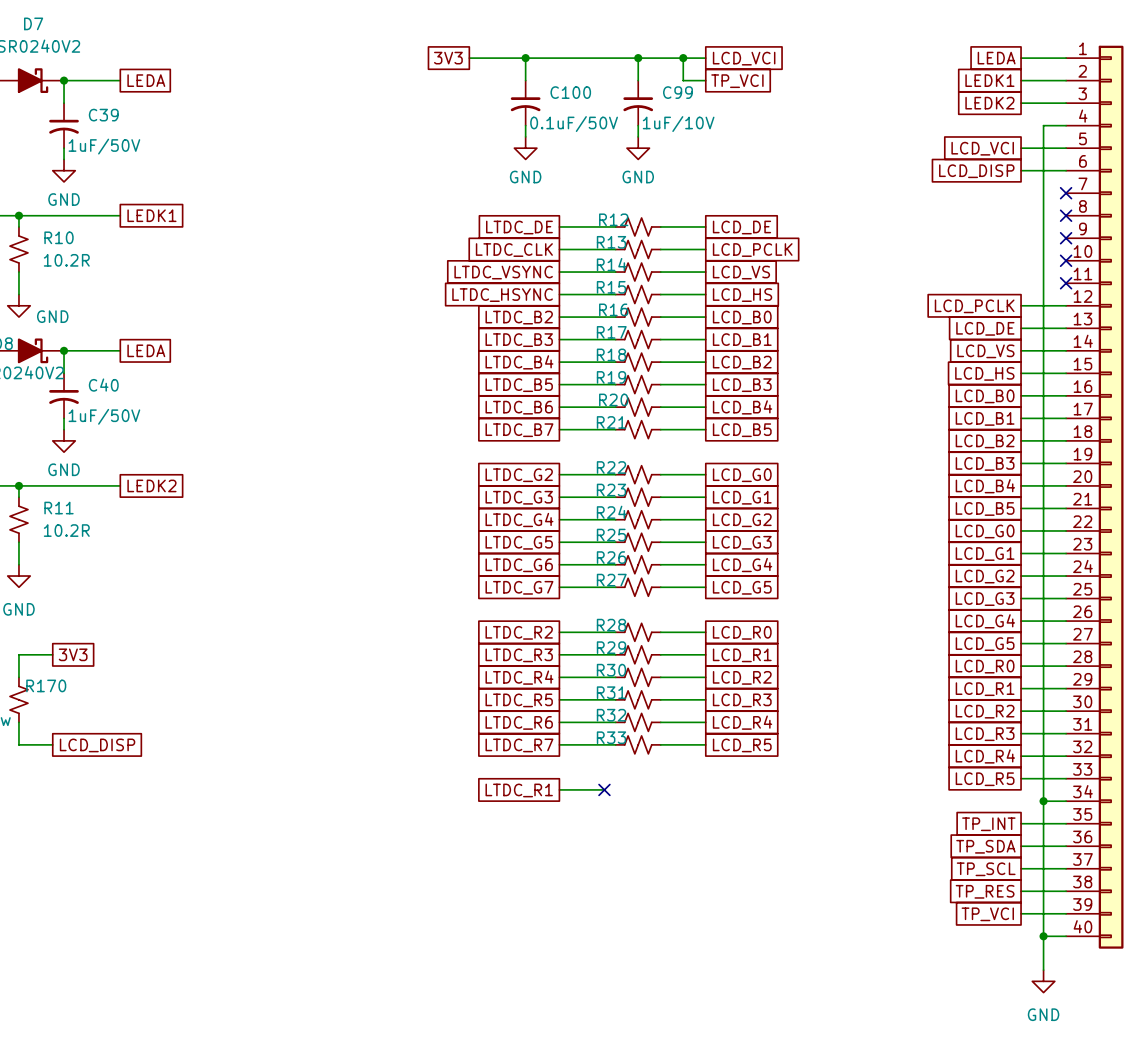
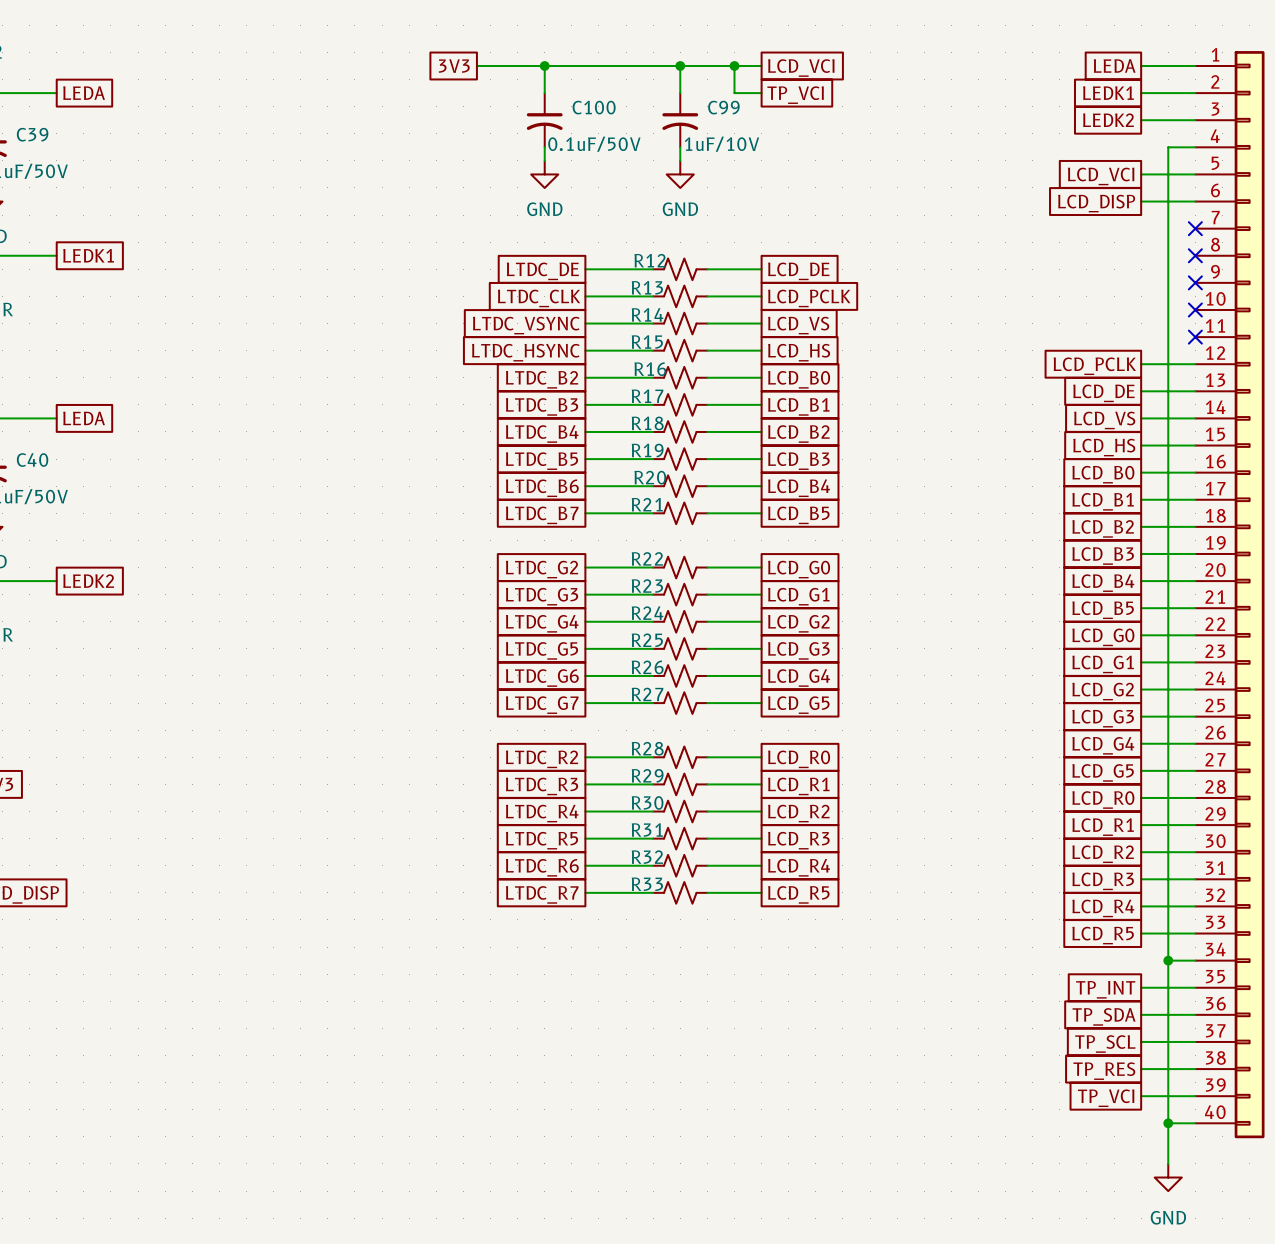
wire: (559, 789) (604, 789) -> none
no-connect mark: (604, 789) -> none
global label: LTDC_R1 (519, 790) -> none

